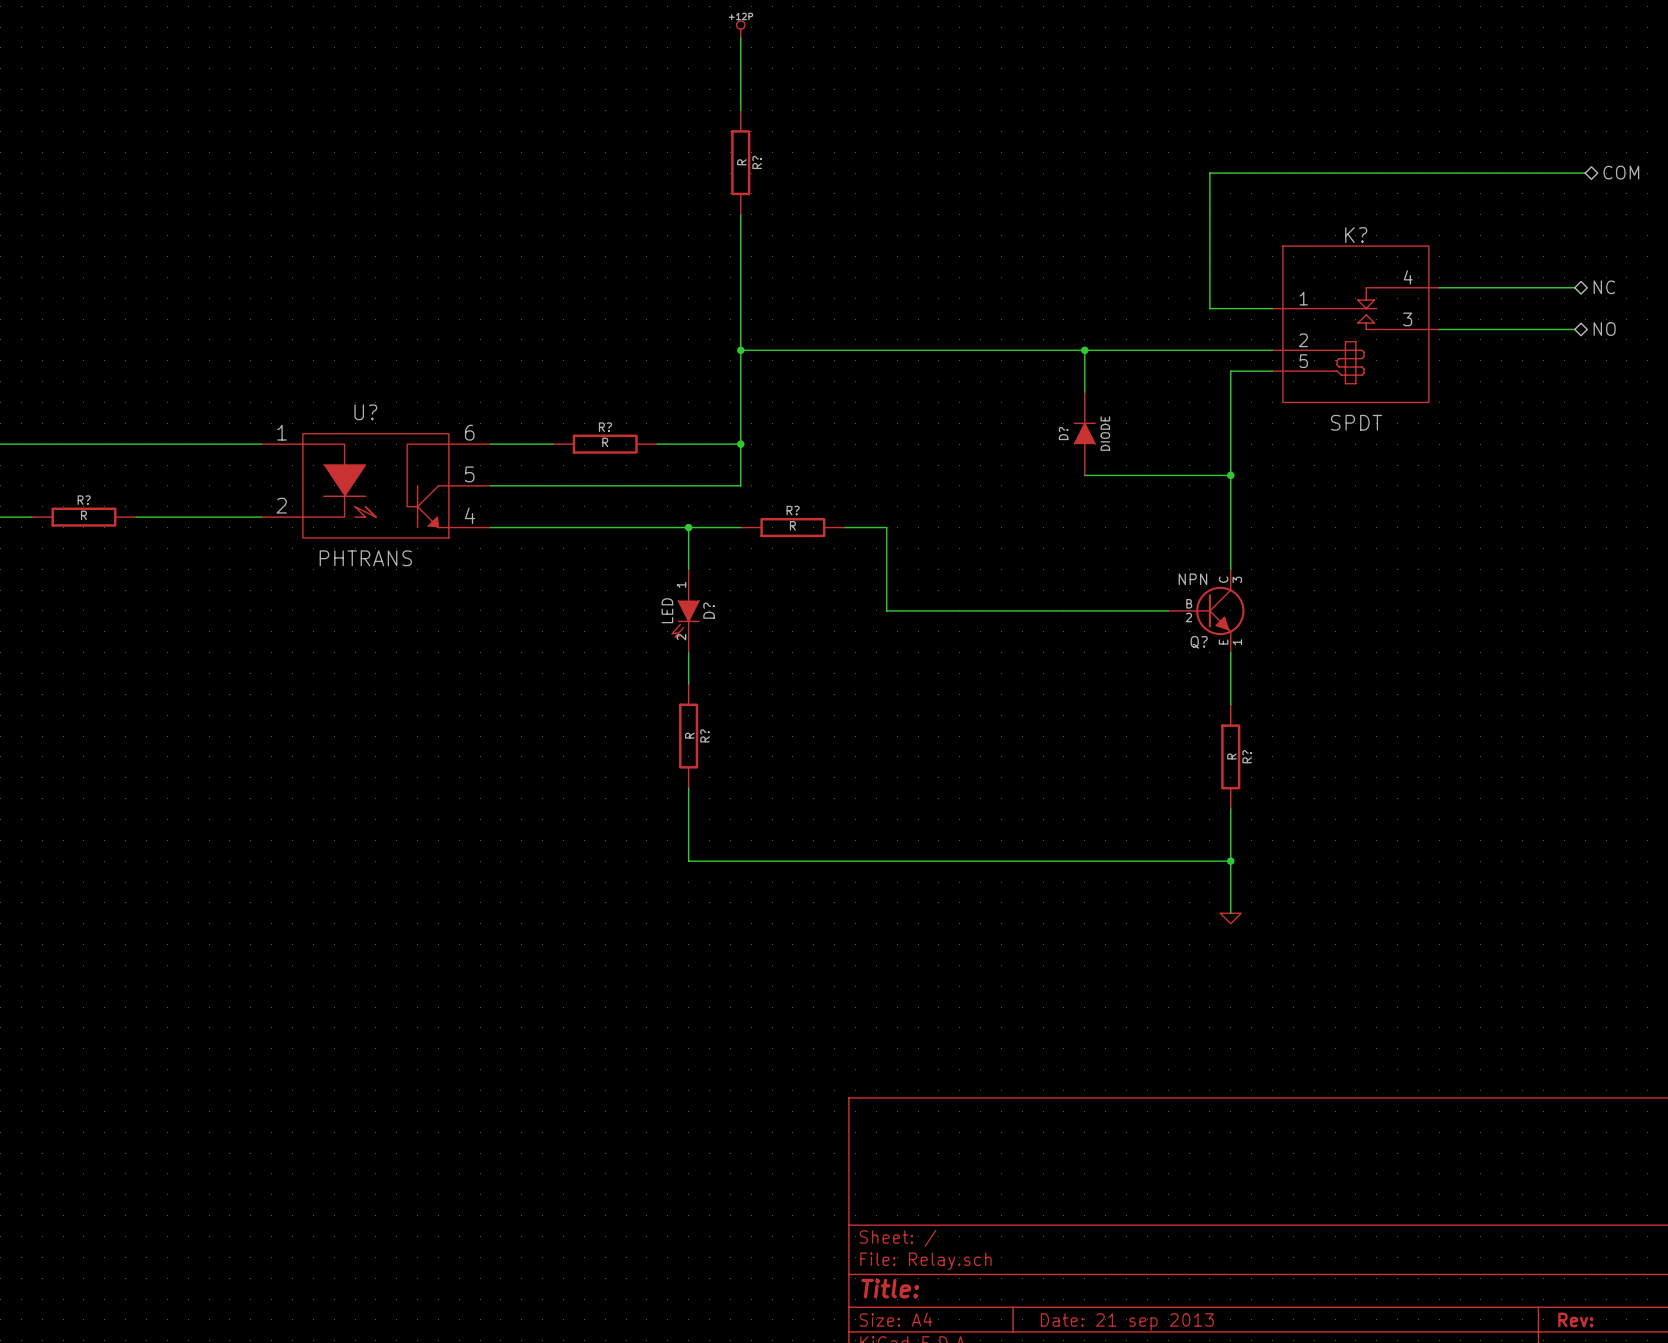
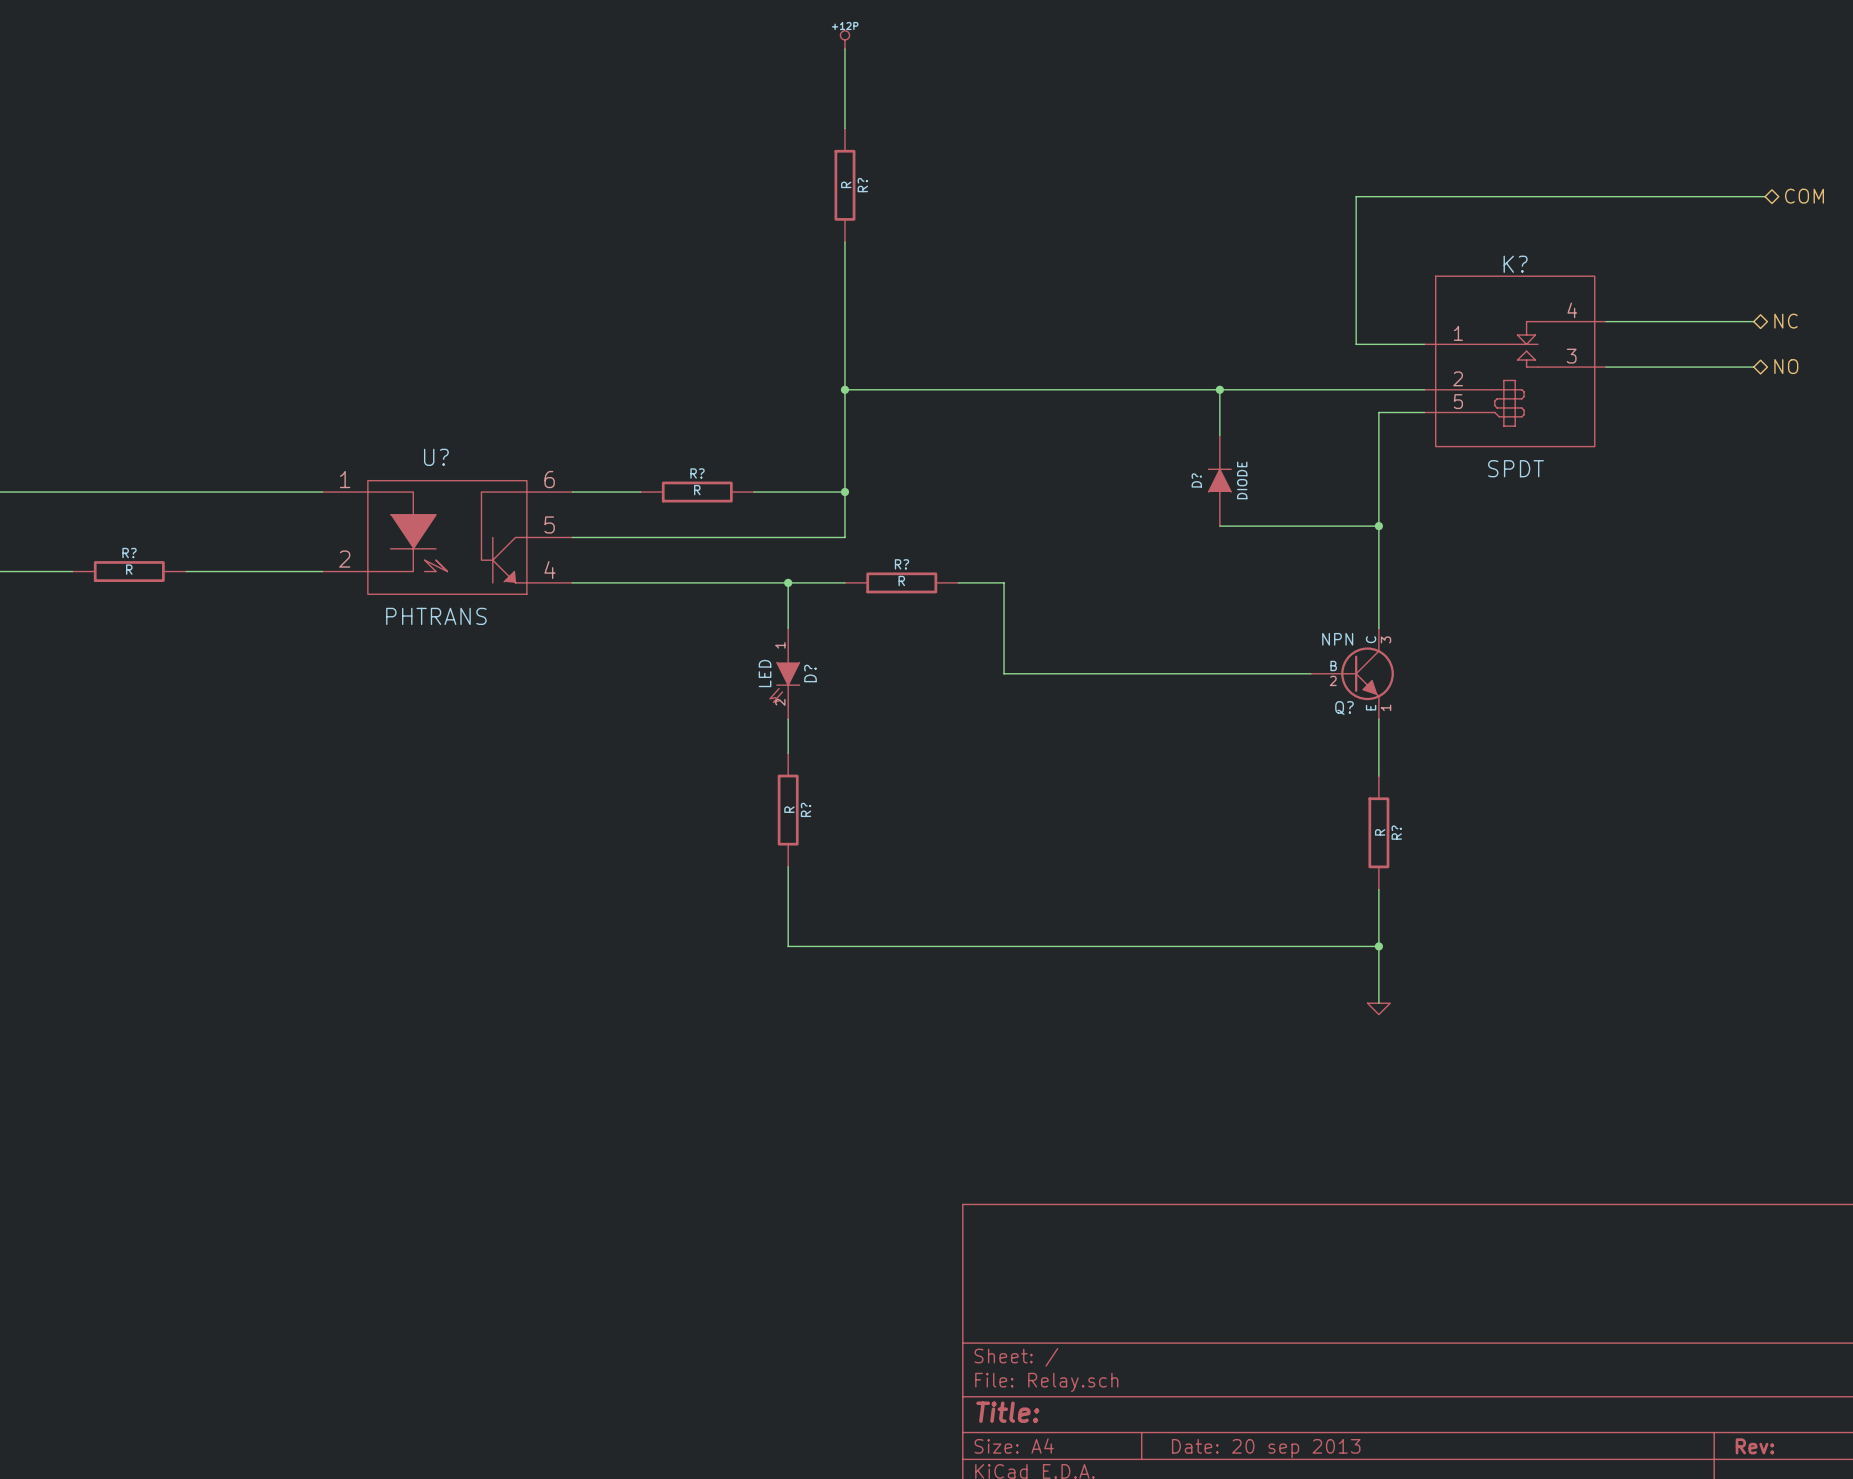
title block: Date: 21 sep 2013 (1127, 1322) -> Date: 20 sep 2013 (1266, 1448)

